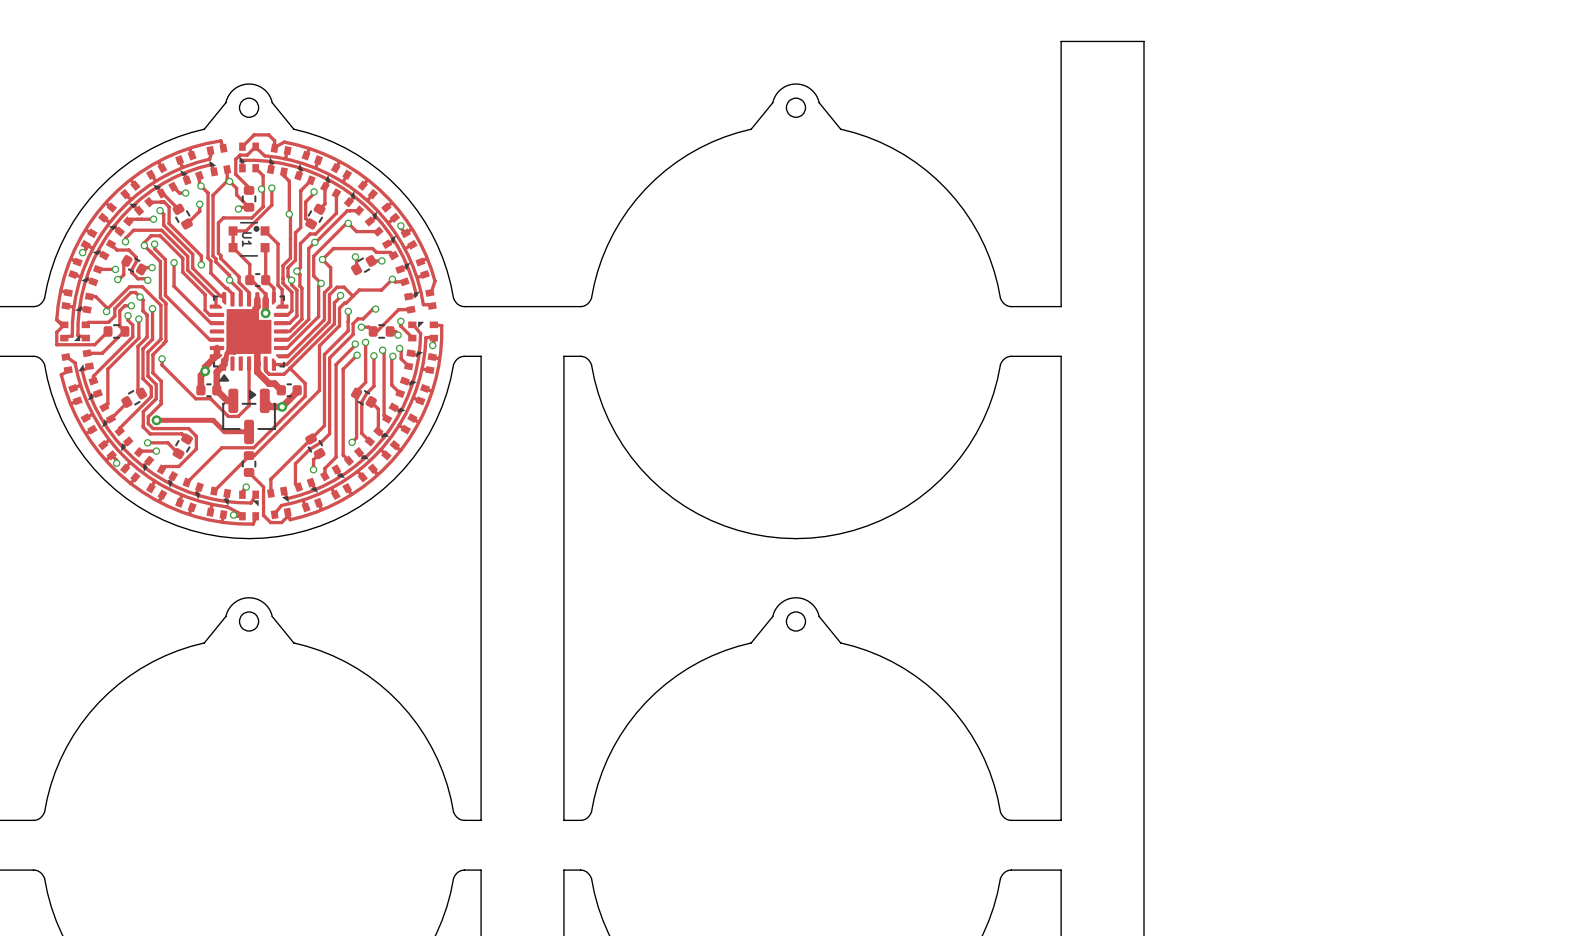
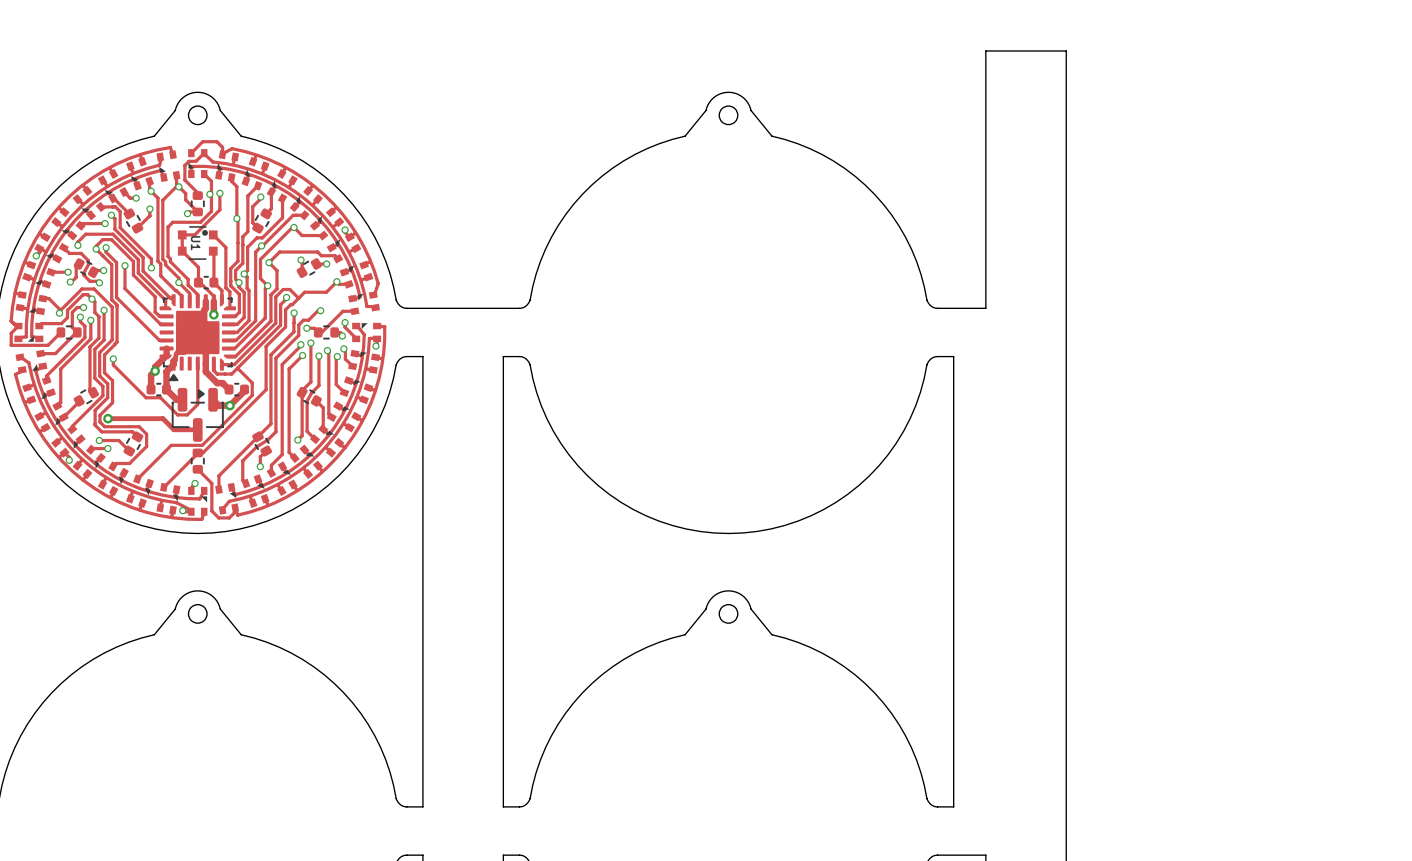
board edge: (1027, 356) (1061, 356) (1061, 820) (1027, 820) -> (953, 356) (953, 806)

